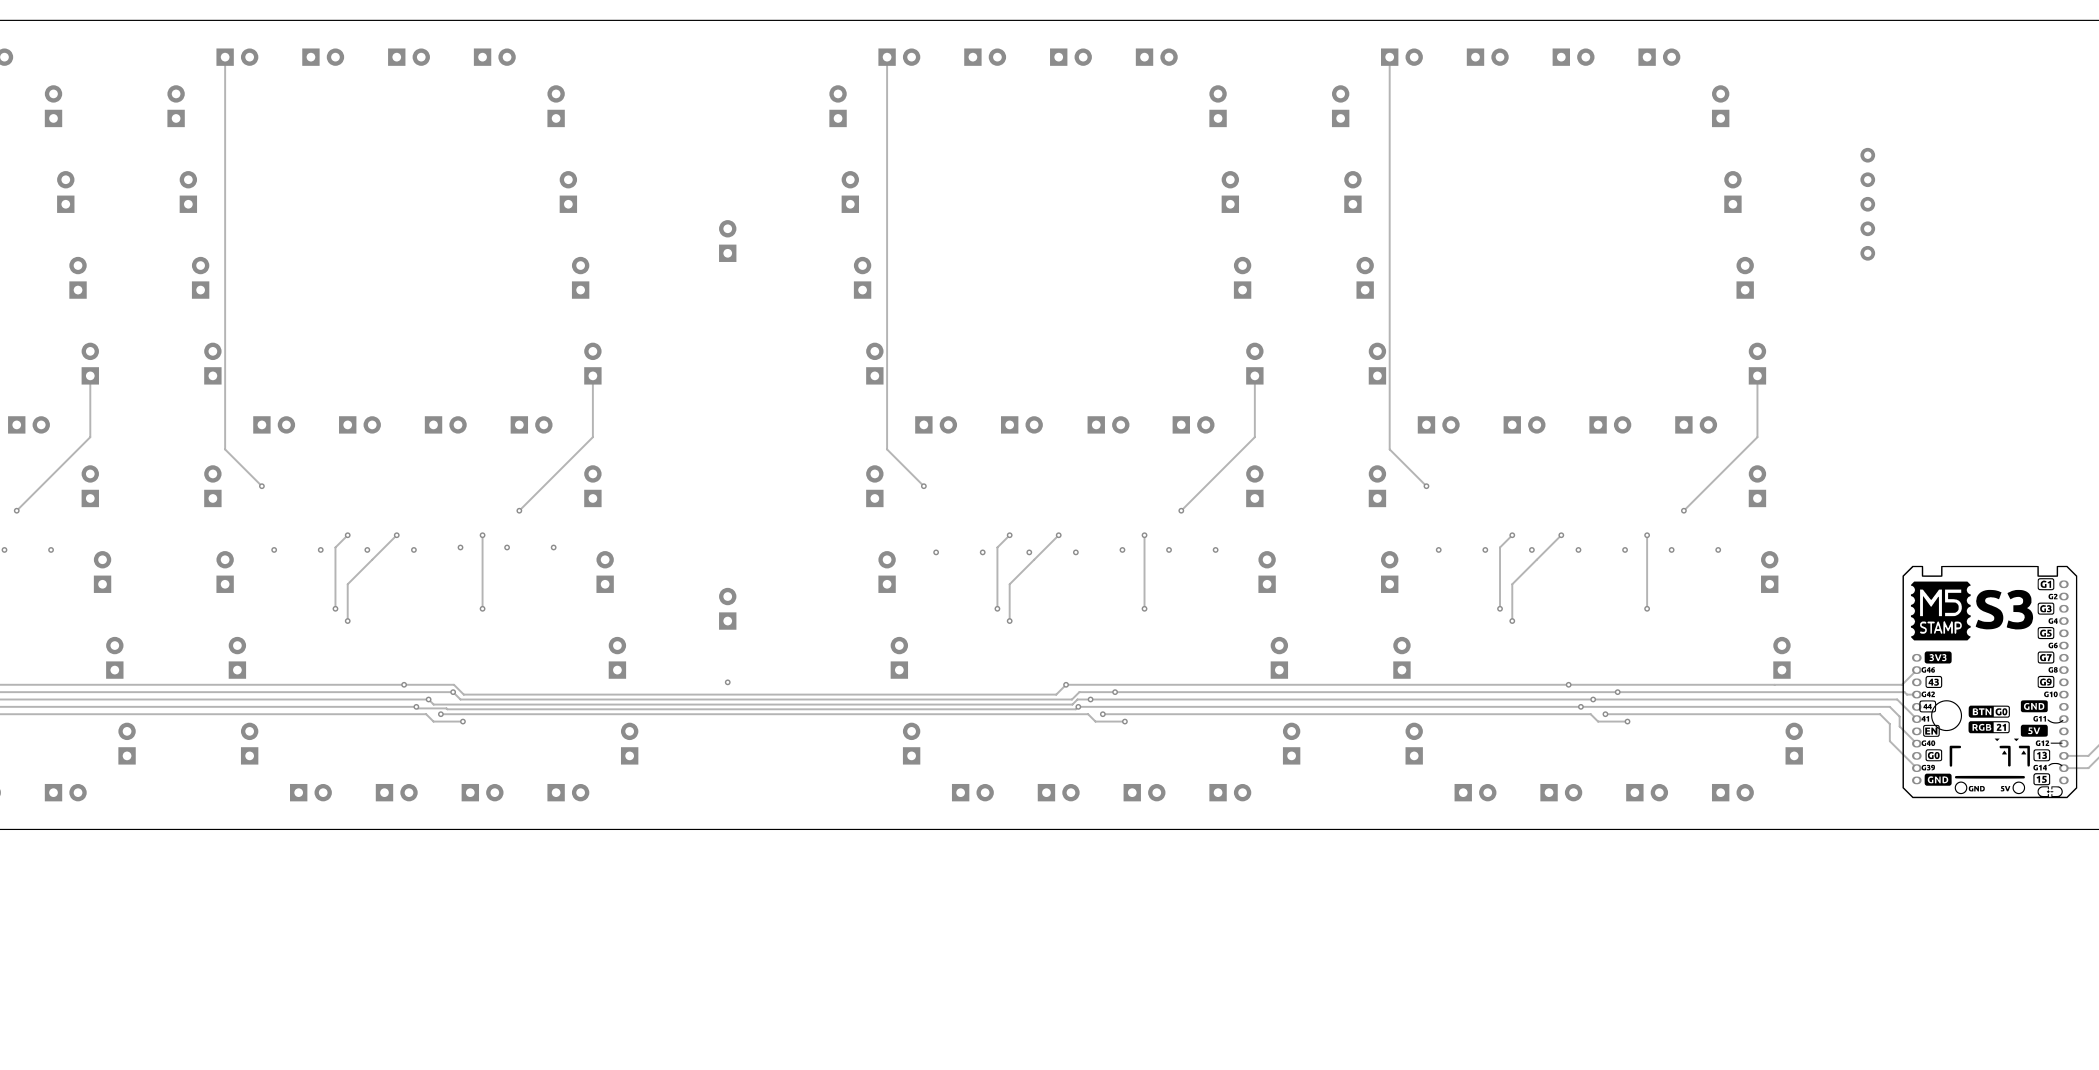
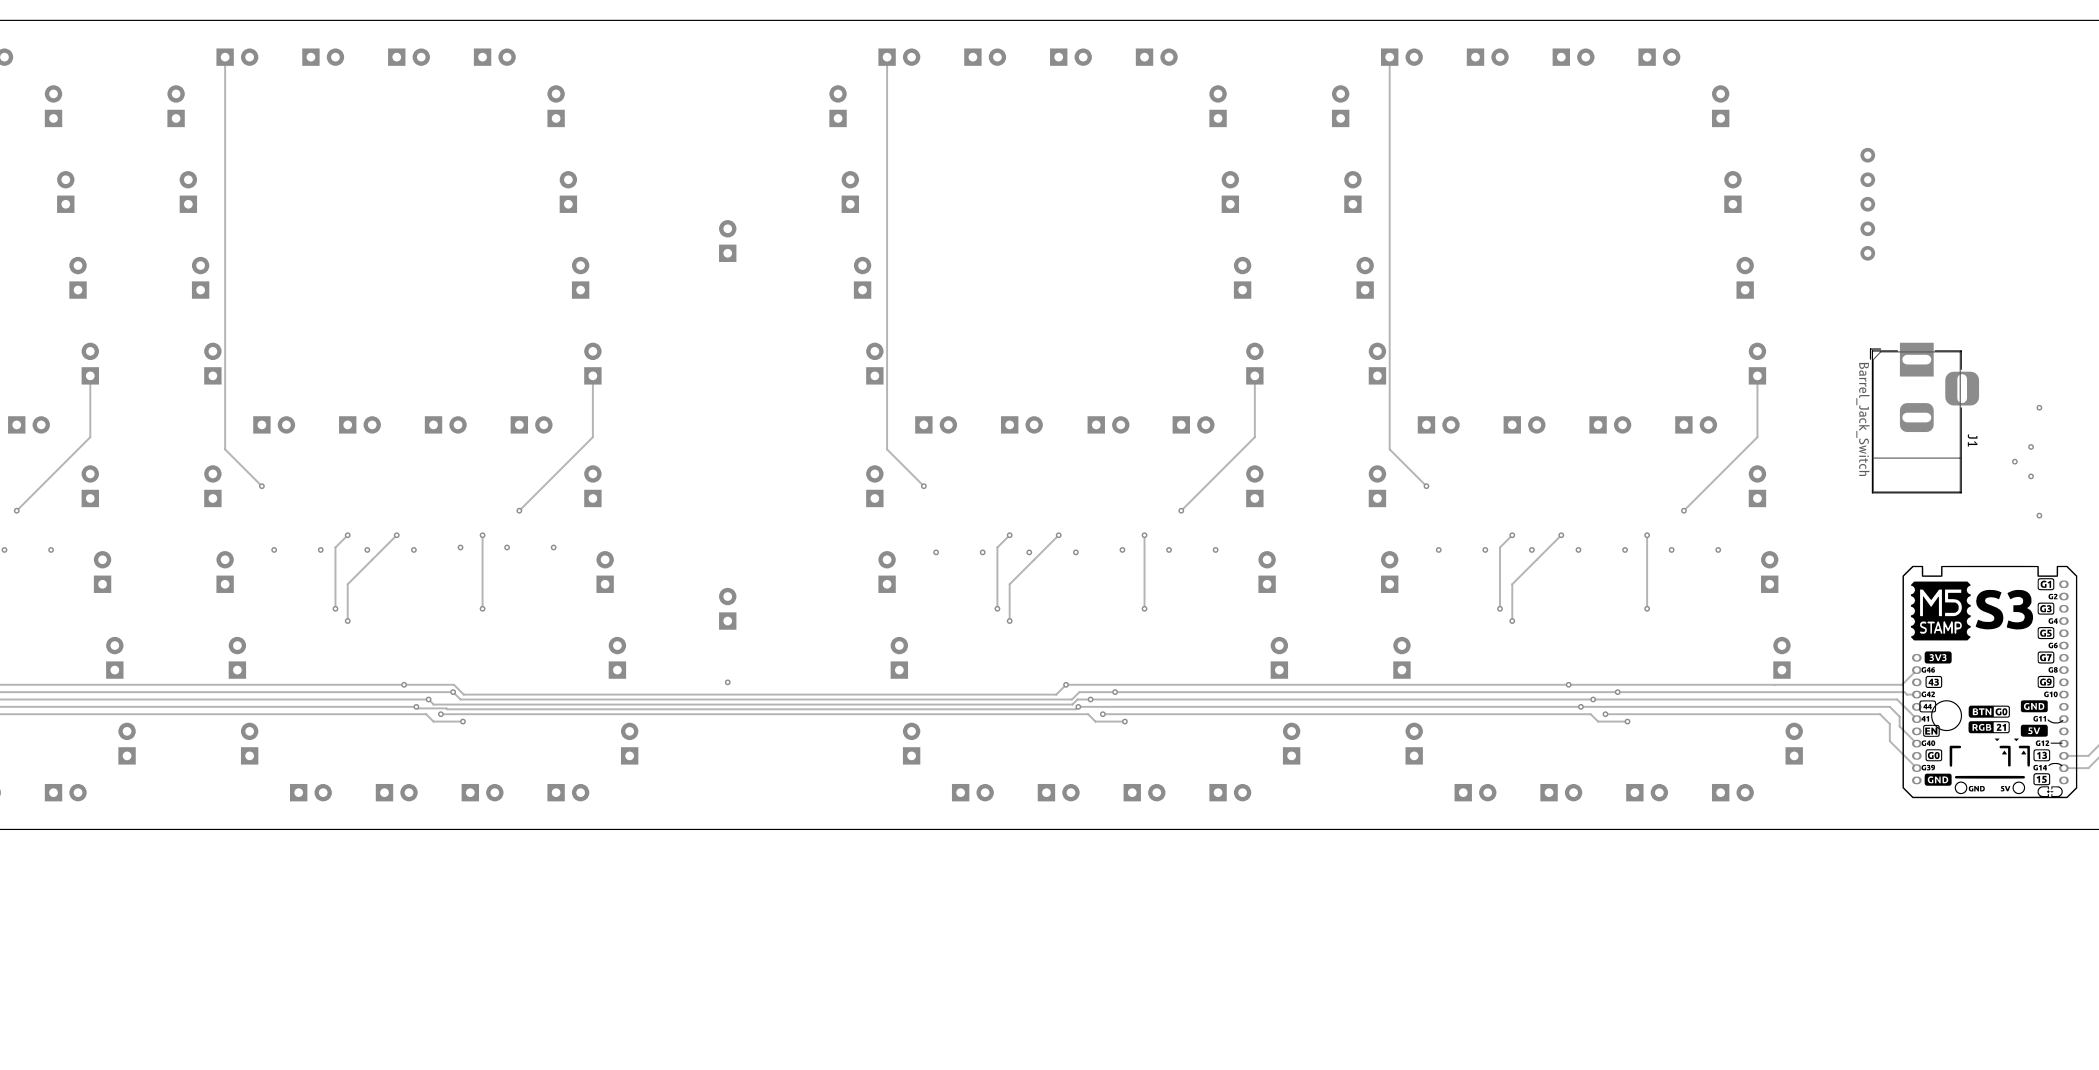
via: none -> (2039, 407)
J1: none -> Barrel_Jack_Switch (1924, 418)
via: none -> (2031, 446)
via: none -> (2014, 461)
via: none -> (2031, 476)
via: none -> (2039, 515)

